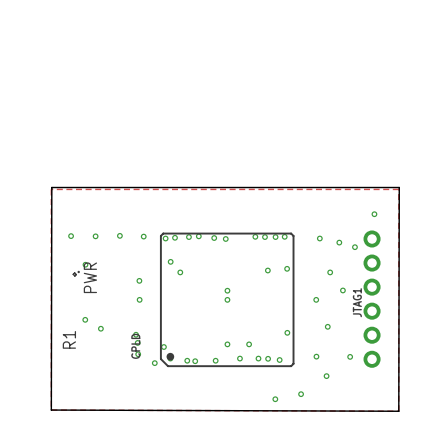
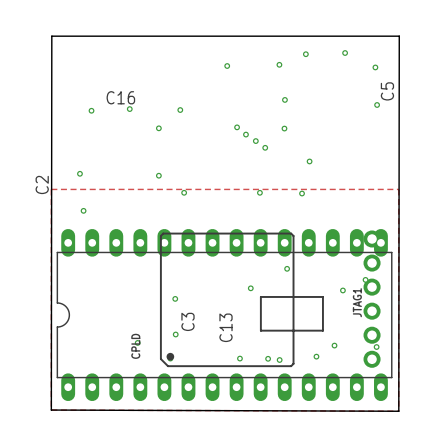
via: none -> (345, 53)
via: none -> (305, 54)
via: none -> (279, 64)
via: none -> (227, 66)
via: none -> (375, 67)
C5: none -> (387, 91)
C16: none -> (120, 97)
via: none -> (284, 99)
via: none -> (377, 104)
via: none -> (129, 109)
via: none -> (91, 110)
via: none -> (180, 110)
via: none -> (237, 127)
via: none -> (158, 128)
via: none -> (284, 128)
via: none -> (245, 134)
via: none -> (255, 141)
via: none -> (265, 147)
via: none -> (309, 161)
via: none -> (79, 173)
via: none -> (158, 175)
C2: none -> (42, 184)
via: none -> (184, 192)
via: none -> (259, 192)
via: none -> (302, 193)
via: none -> (83, 210)
via: (374, 214) -> none
via: (119, 235) -> none
via: (71, 236) -> none
via: (95, 236) -> none
via: (143, 236) -> none
via: (198, 236) -> none
via: (255, 236) -> none
via: (284, 236) -> none
via: (175, 237) -> none
via: (188, 237) -> none
via: (264, 237) -> none
via: (275, 237) -> none
via: (165, 238) -> none
via: (214, 238) -> none
via: (225, 238) -> none
via: (319, 238) -> none
via: (339, 242) -> none
via: (354, 247) -> none
via: (170, 261) -> none
via: (85, 264) -> none
via: (267, 270) -> none
via: (180, 272) -> none
via: (330, 272) -> none
PWR: (76, 273) -> none
via: none -> (365, 279)
via: (139, 280) -> none
via: none -> (250, 288)
via: (227, 290) -> none
via: none -> (175, 298)
via: (139, 299) -> none
via: (227, 299) -> none
via: (316, 299) -> none
part: none -> (291, 313)
part: none -> (224, 315)
via: (85, 319) -> none
C3: none -> (187, 321)
via: (327, 326) -> none
C13: none -> (226, 327)
via: (100, 328) -> none
via: (287, 332) -> none
via: (136, 334) -> none
via: none -> (175, 334)
R1: (69, 339) -> none
via: (227, 344) -> none
via: (249, 344) -> none
via: none -> (334, 345)
via: (163, 347) -> none
via: none -> (376, 347)
via: (138, 354) -> none
via: (350, 356) -> none
via: (258, 358) -> none
via: (187, 360) -> none
via: (215, 360) -> none
via: (195, 361) -> none
via: (154, 363) -> none
via: (326, 376) -> none
via: (301, 394) -> none
via: (275, 399) -> none
board edge: (51, 410) (51, 187) (399, 187) (398, 411) -> (51, 410) (51, 36) (399, 36) (398, 411)

